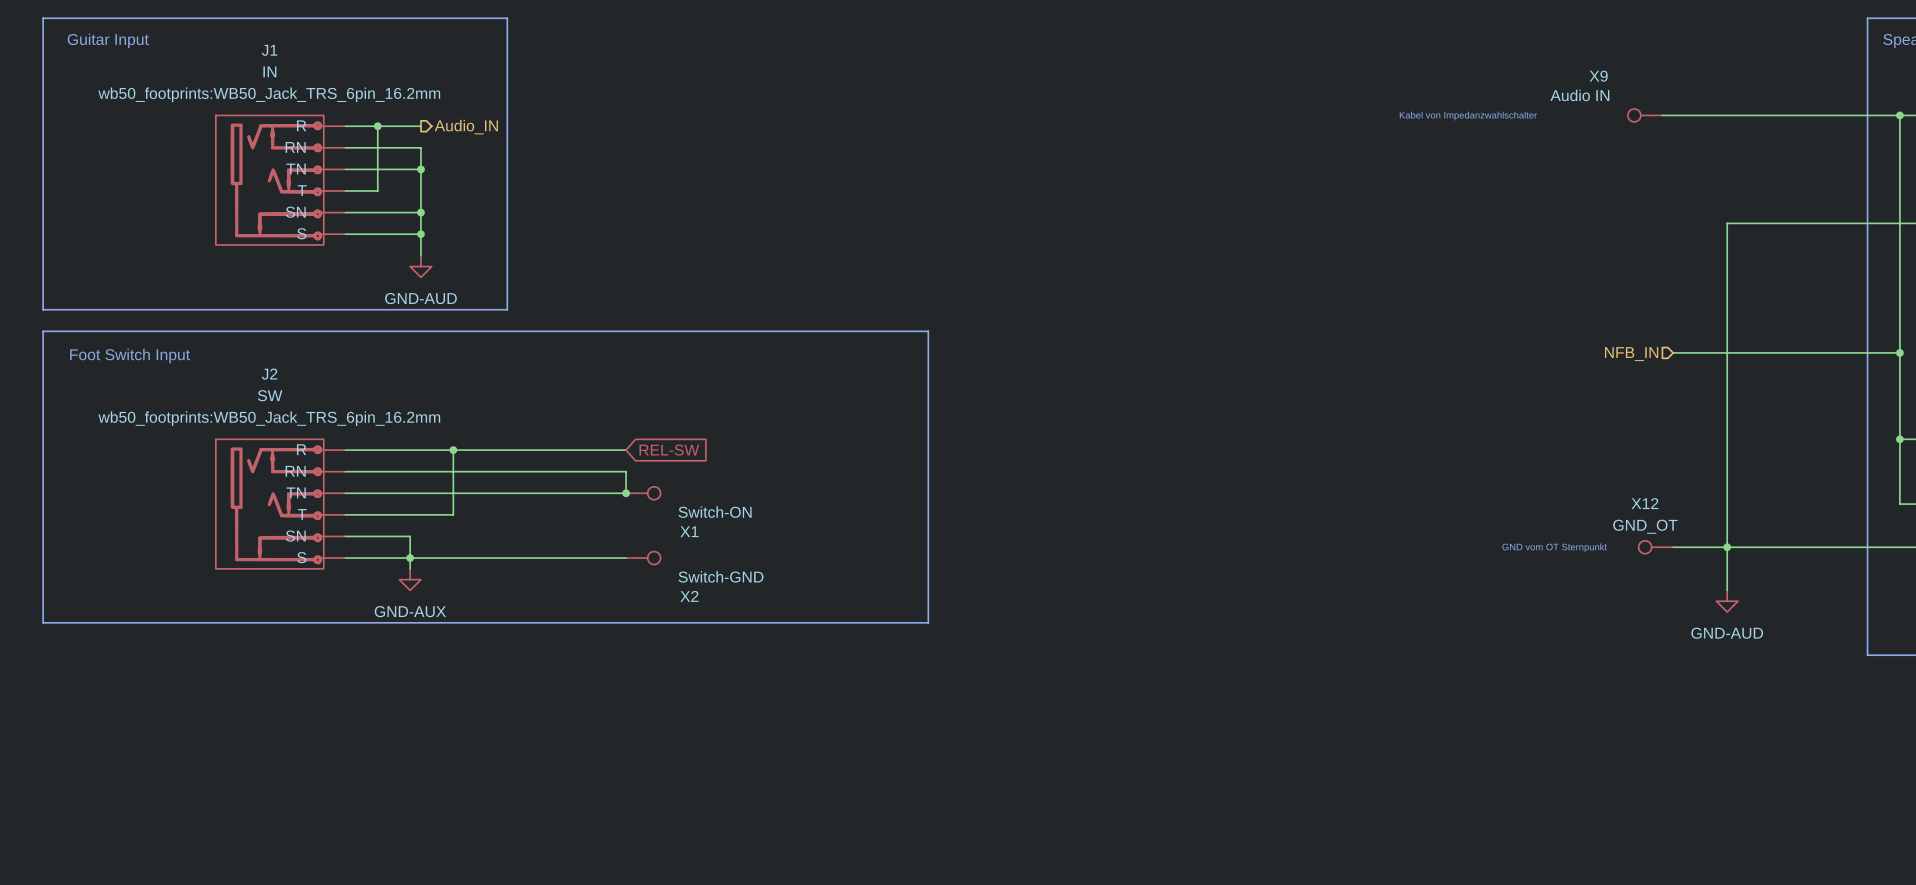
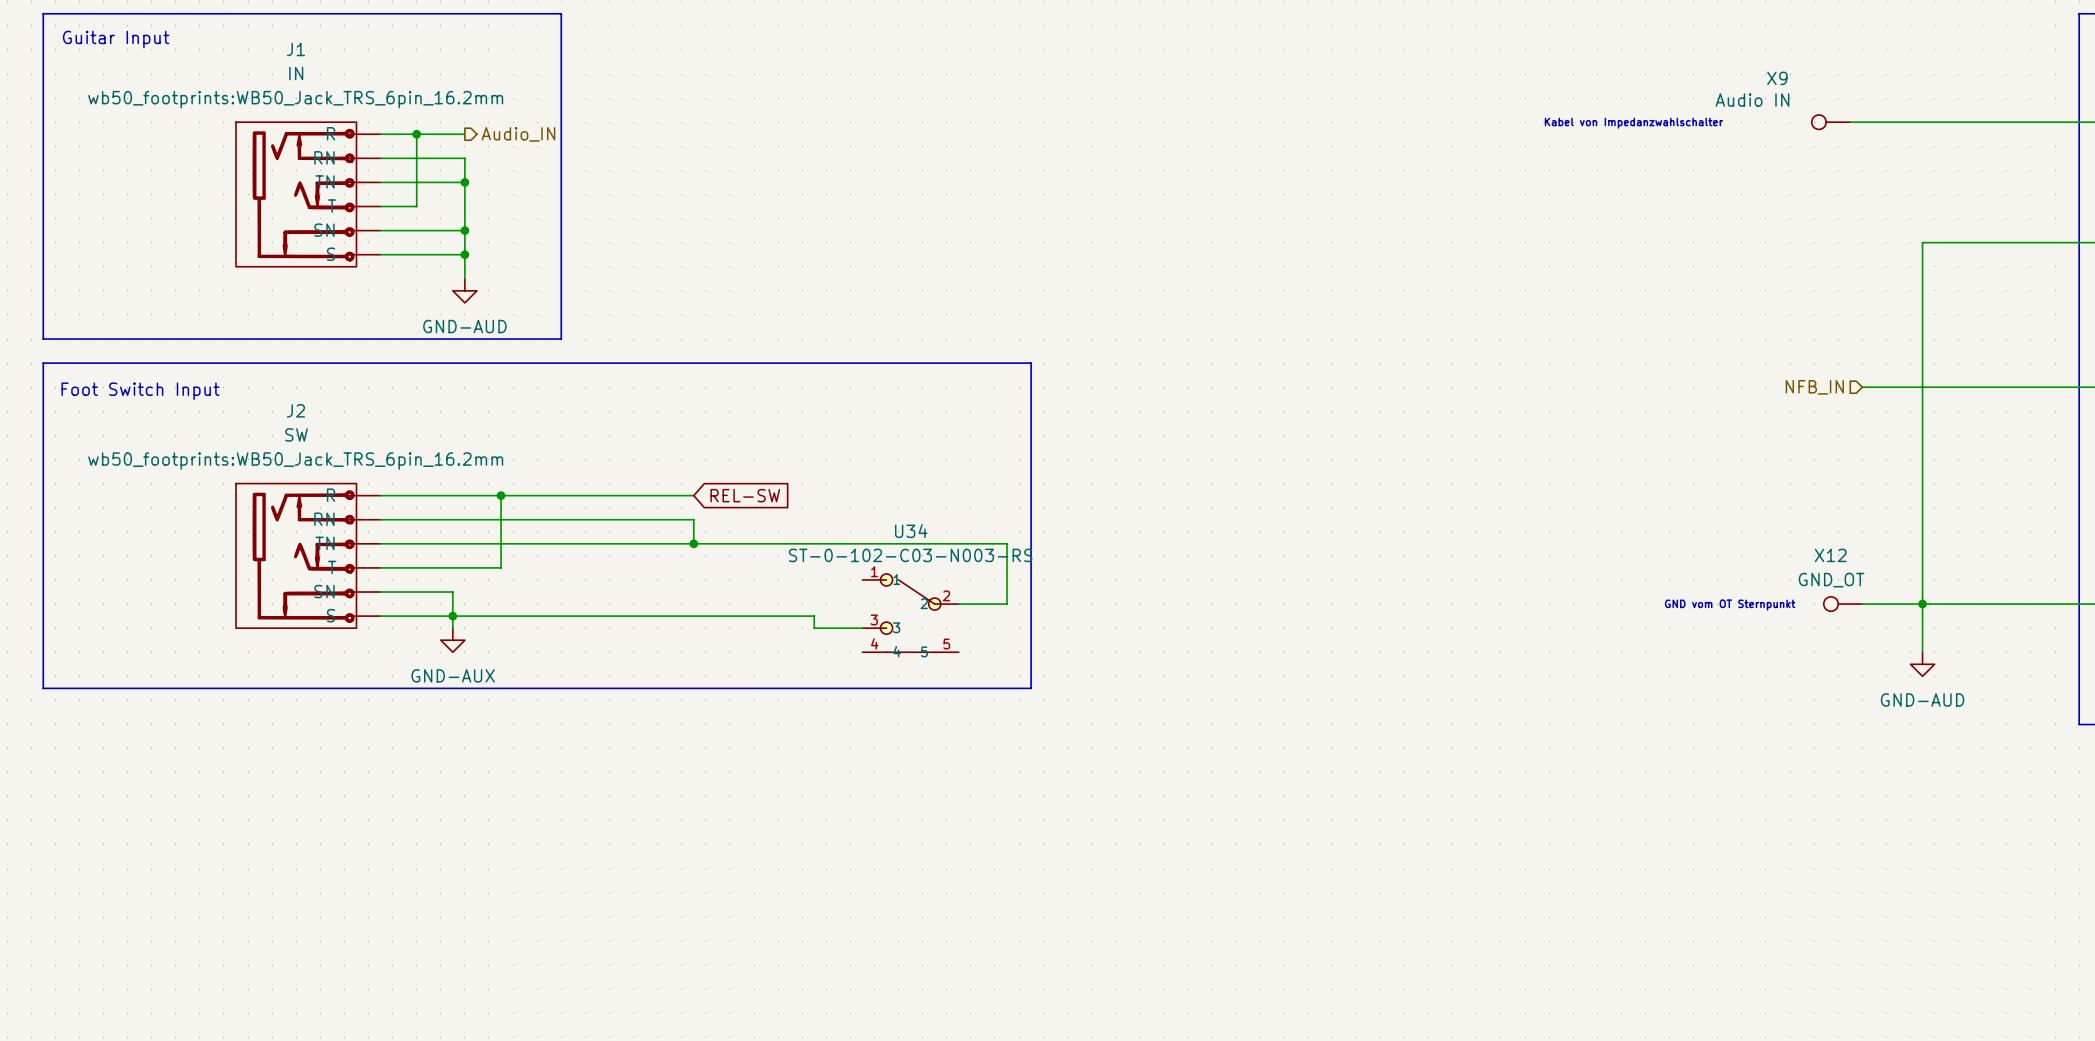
wire: none -> (693, 543) (1007, 543) (1007, 604) (958, 604)
X1: Switch-ON (643, 493) -> none
U34: none -> ST-0-102-C03-N003-RS (910, 613)
wire: none -> (693, 616) (814, 616) (814, 628) (862, 628)
X2: Switch-GND (643, 558) -> none

